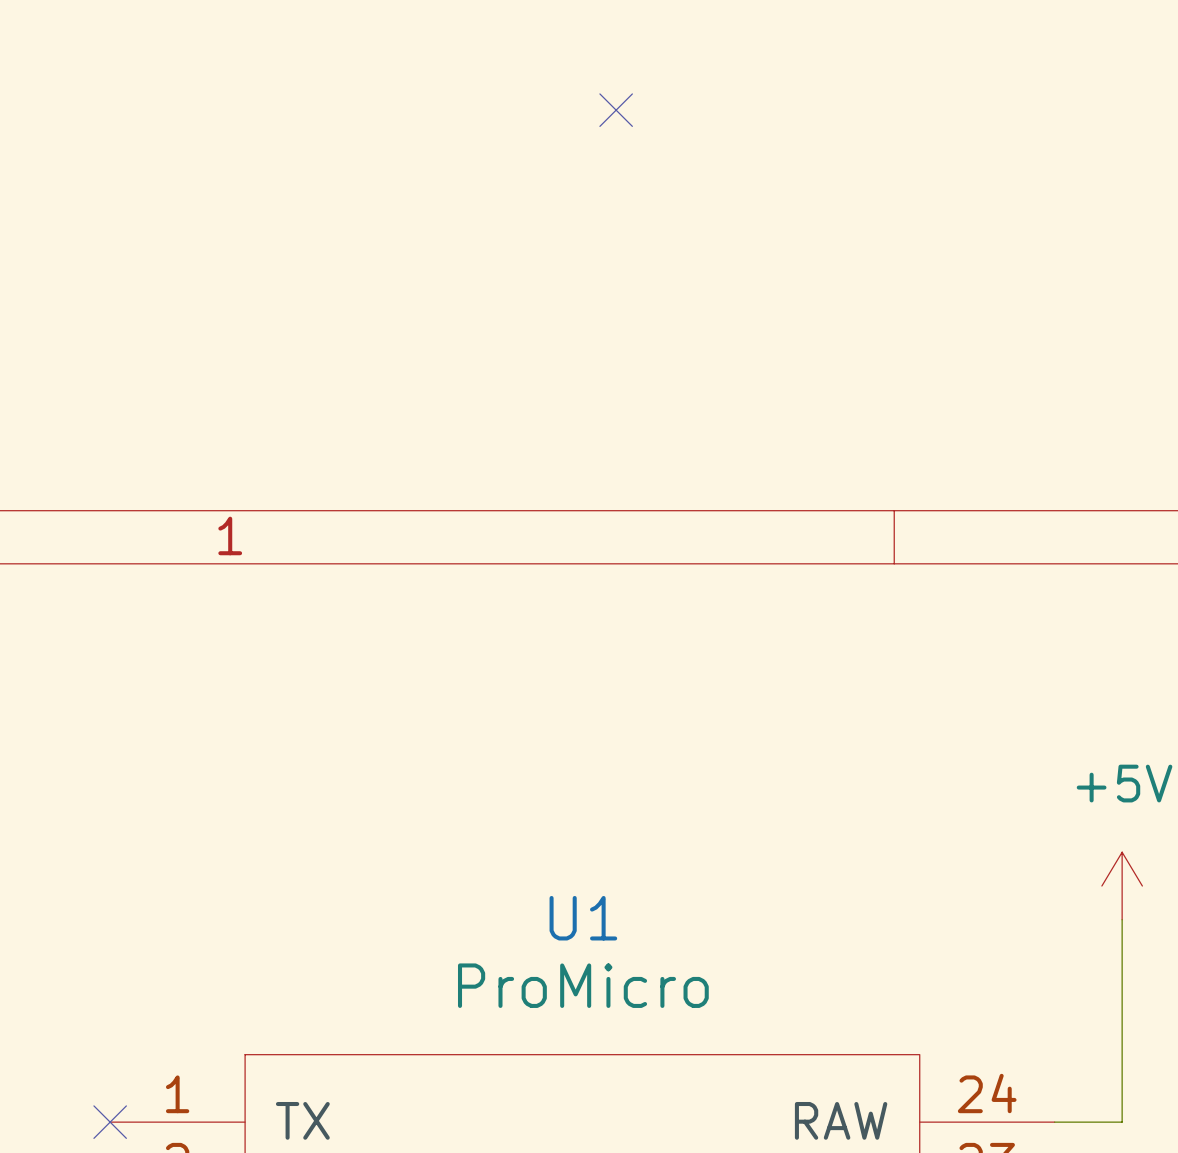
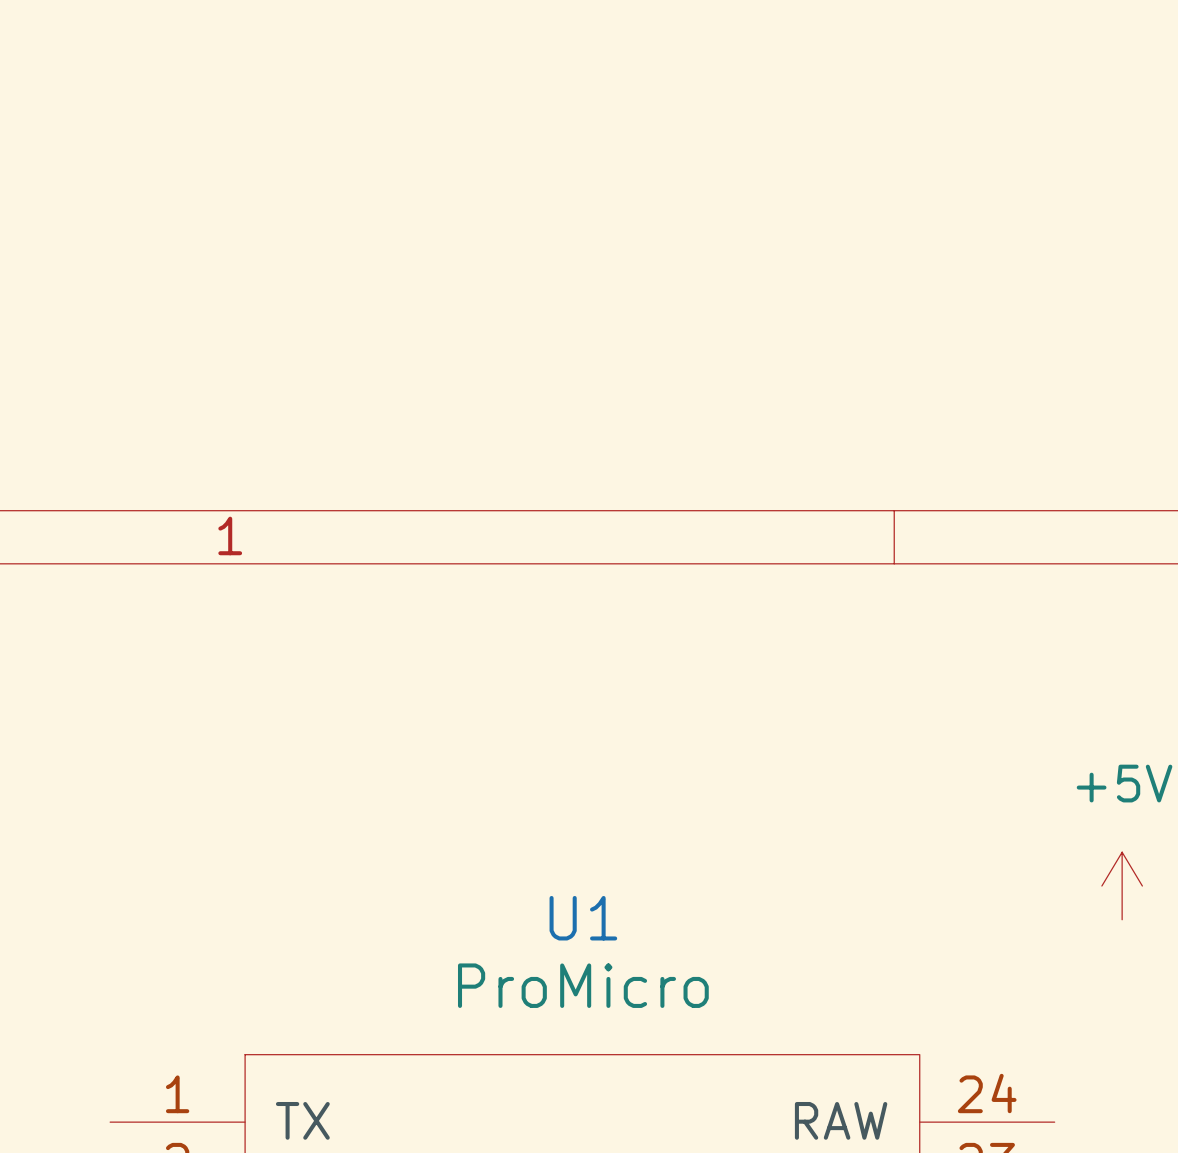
no-connect mark: (616, 110) -> none
wire: (1122, 919) (1122, 1122) (1054, 1122) -> none
no-connect mark: (110, 1122) -> none

